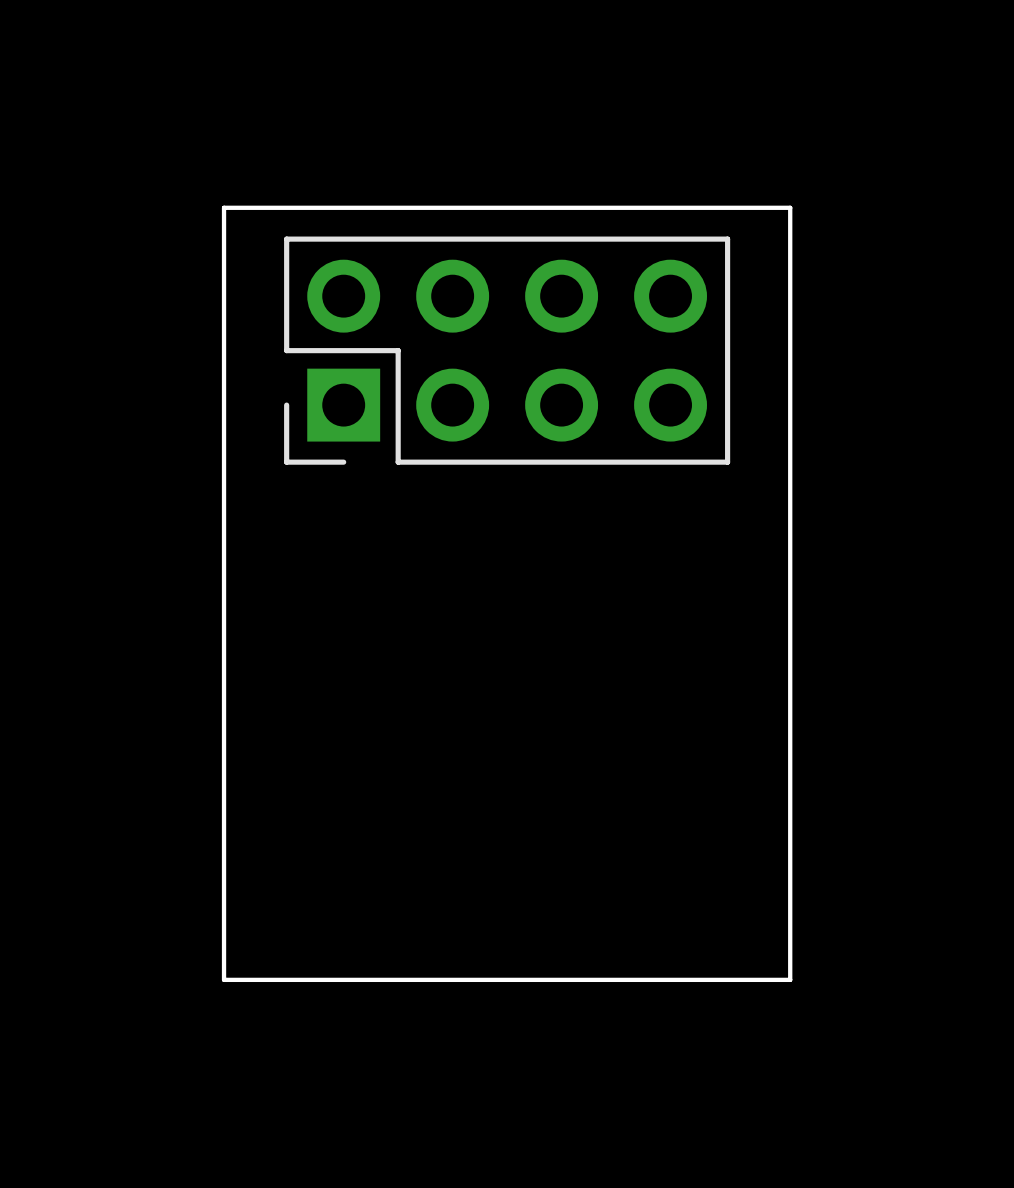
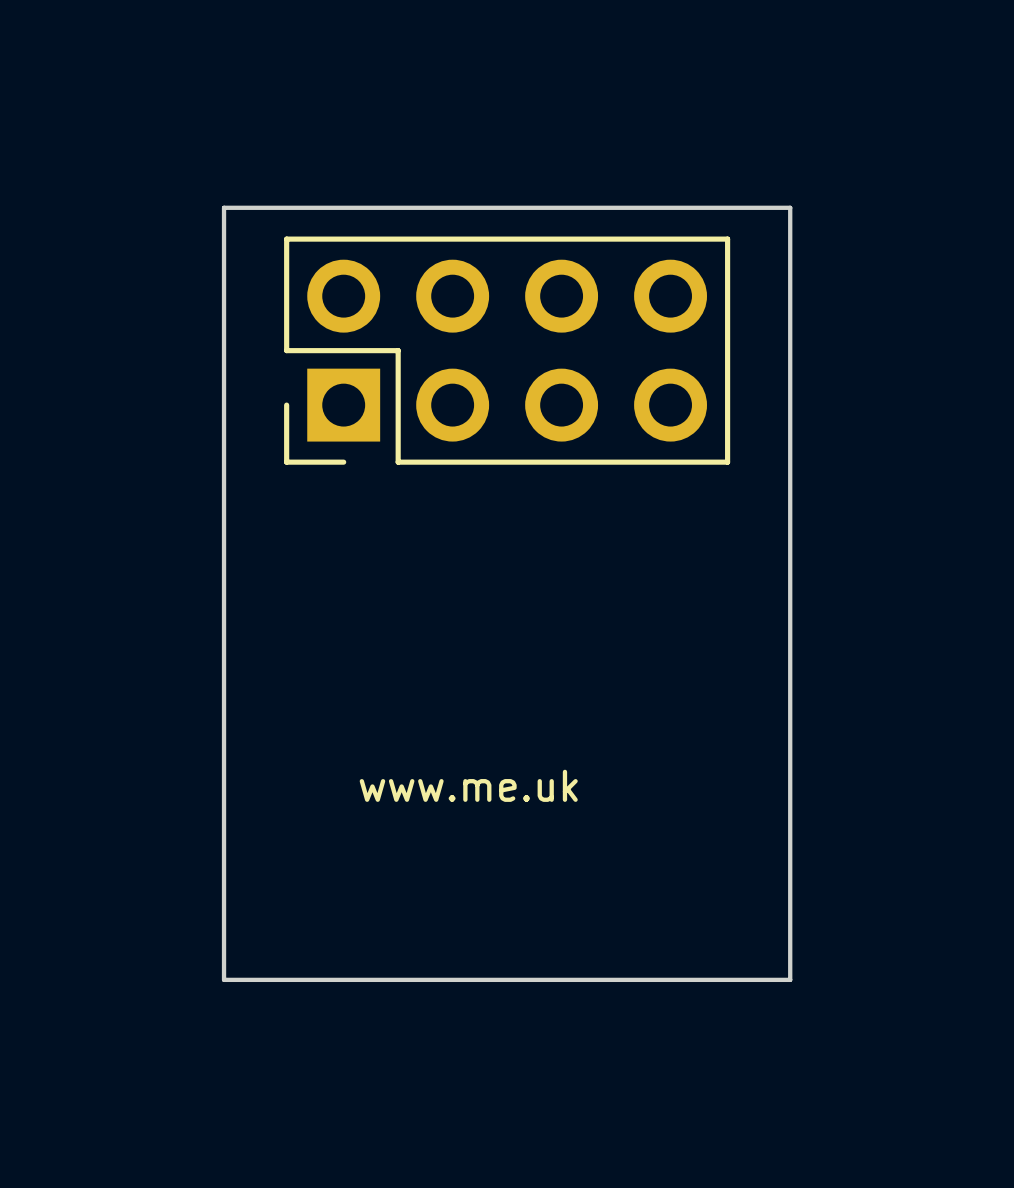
drawing: none -> [359, 769, 578, 802]

